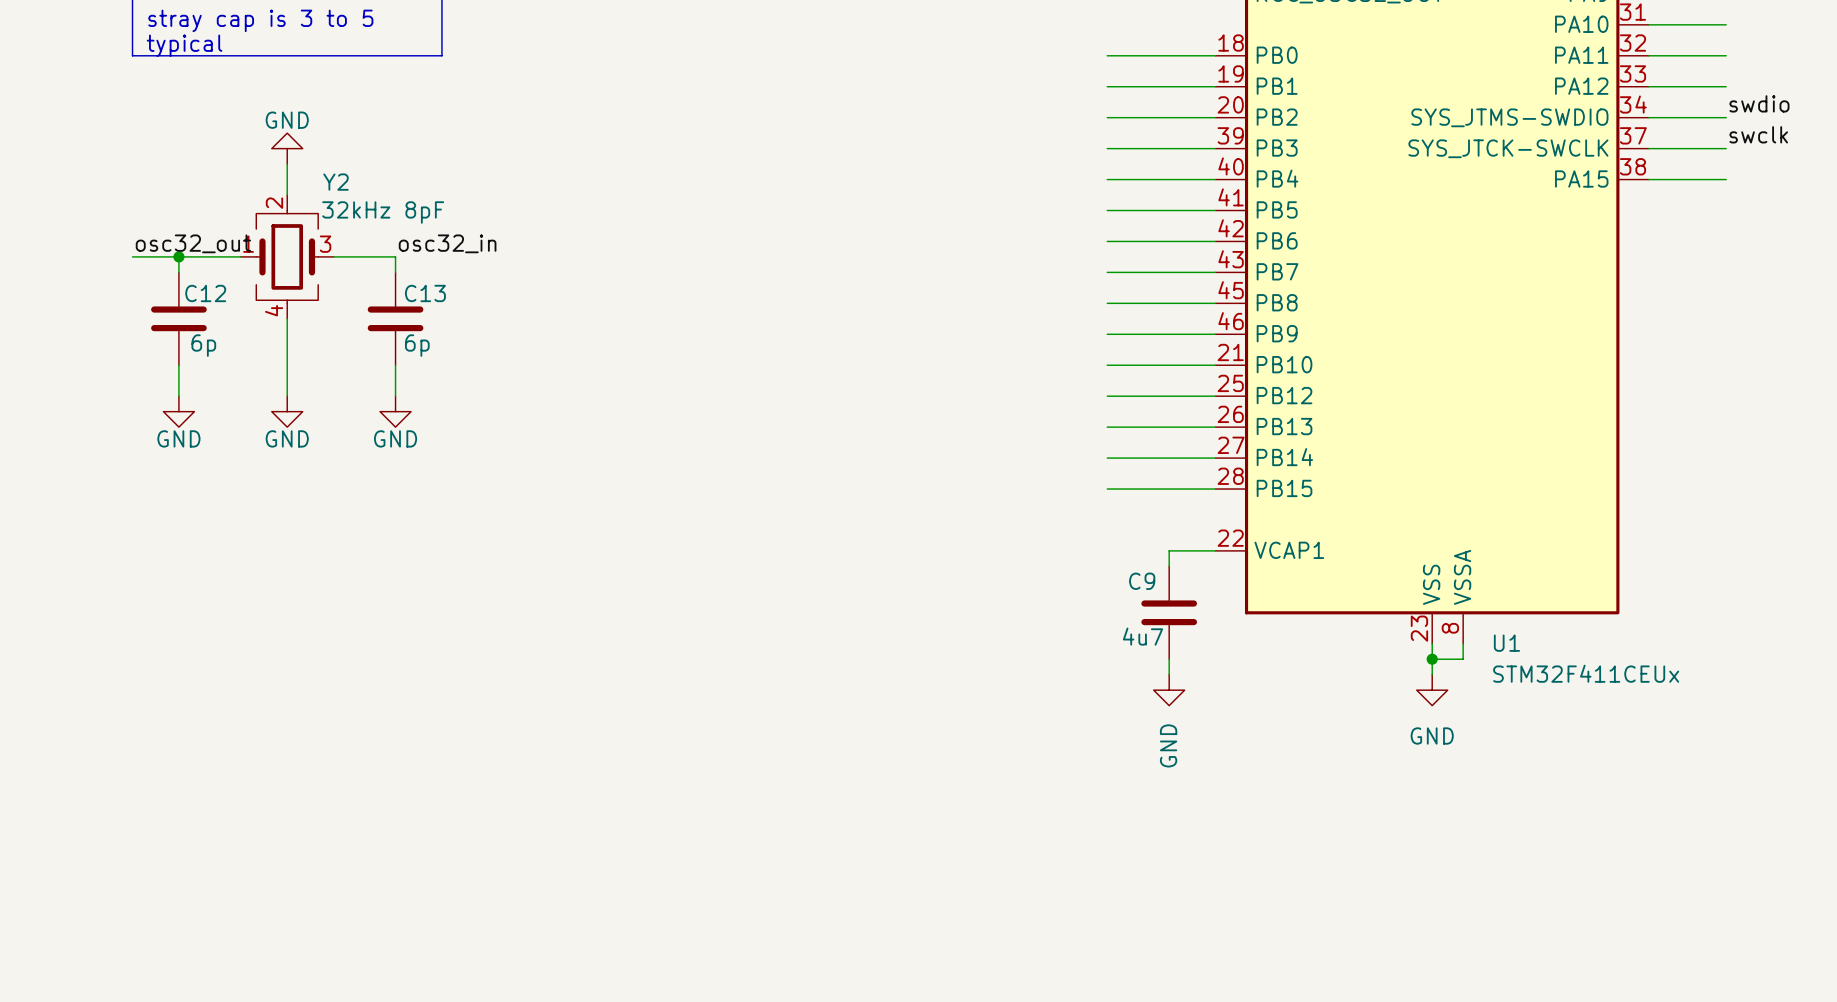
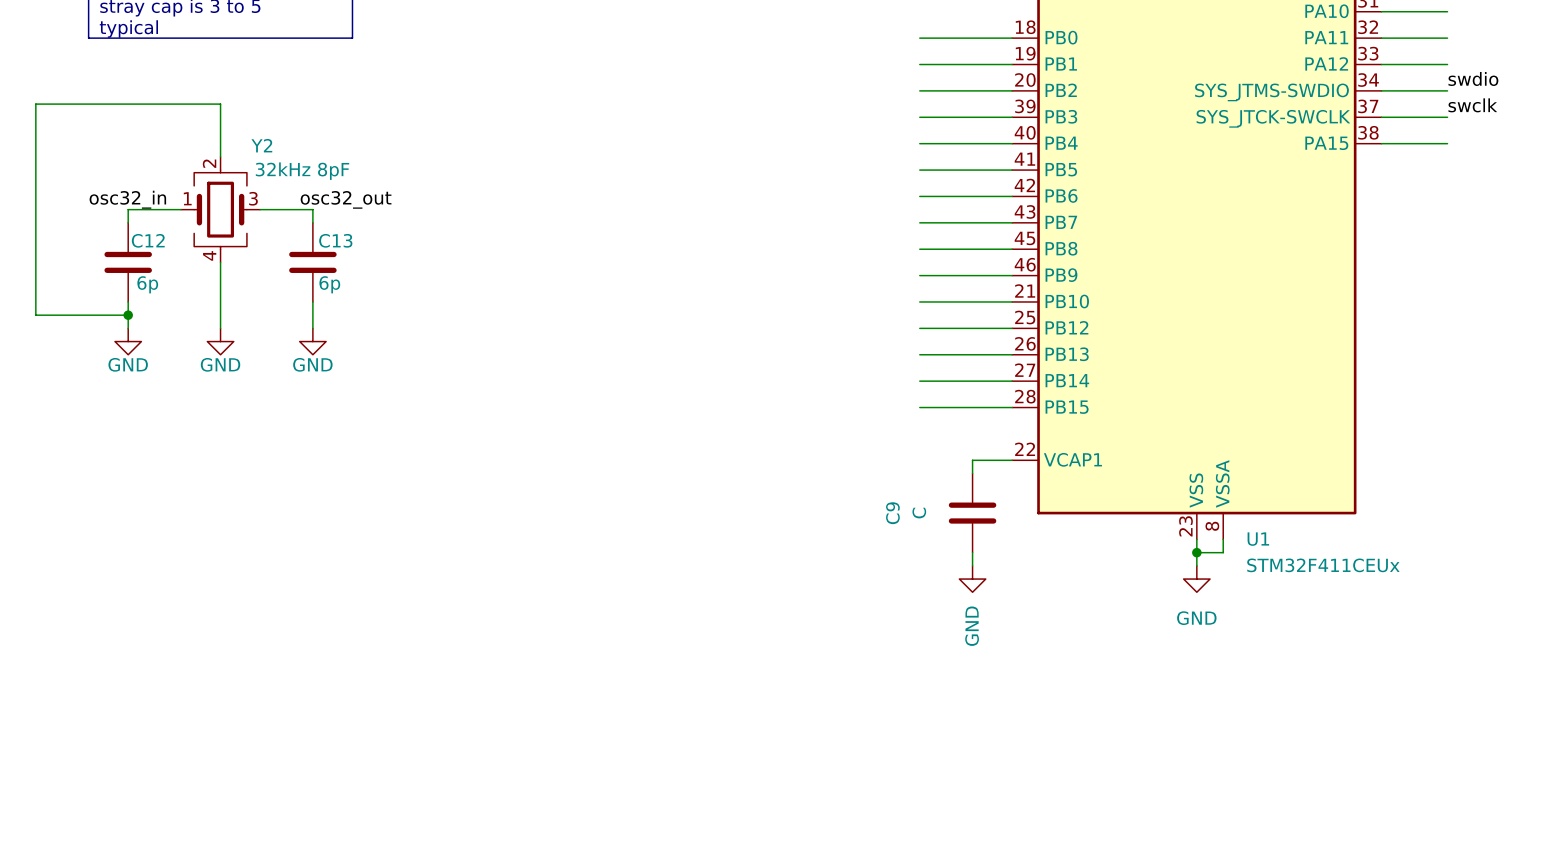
power symbol: GND (287, 148) -> none
wire: none -> (220, 130) (220, 104) (35, 104) (35, 315) (128, 315)
label: osc32_out (193, 243) -> osc32_in (127, 199)
label: osc32_in (447, 243) -> osc32_out (346, 199)
wire: (132, 256) (178, 256) -> none
junction: (178, 256) -> none
junction: none -> (128, 315)
C9 name rotation: 0° (1142, 581) -> 90° counterclockwise (892, 513)
C9 name position: C9 (1142, 581) -> C9 (892, 513)
C9 value: 4u7 (1142, 636) -> C (919, 513)

